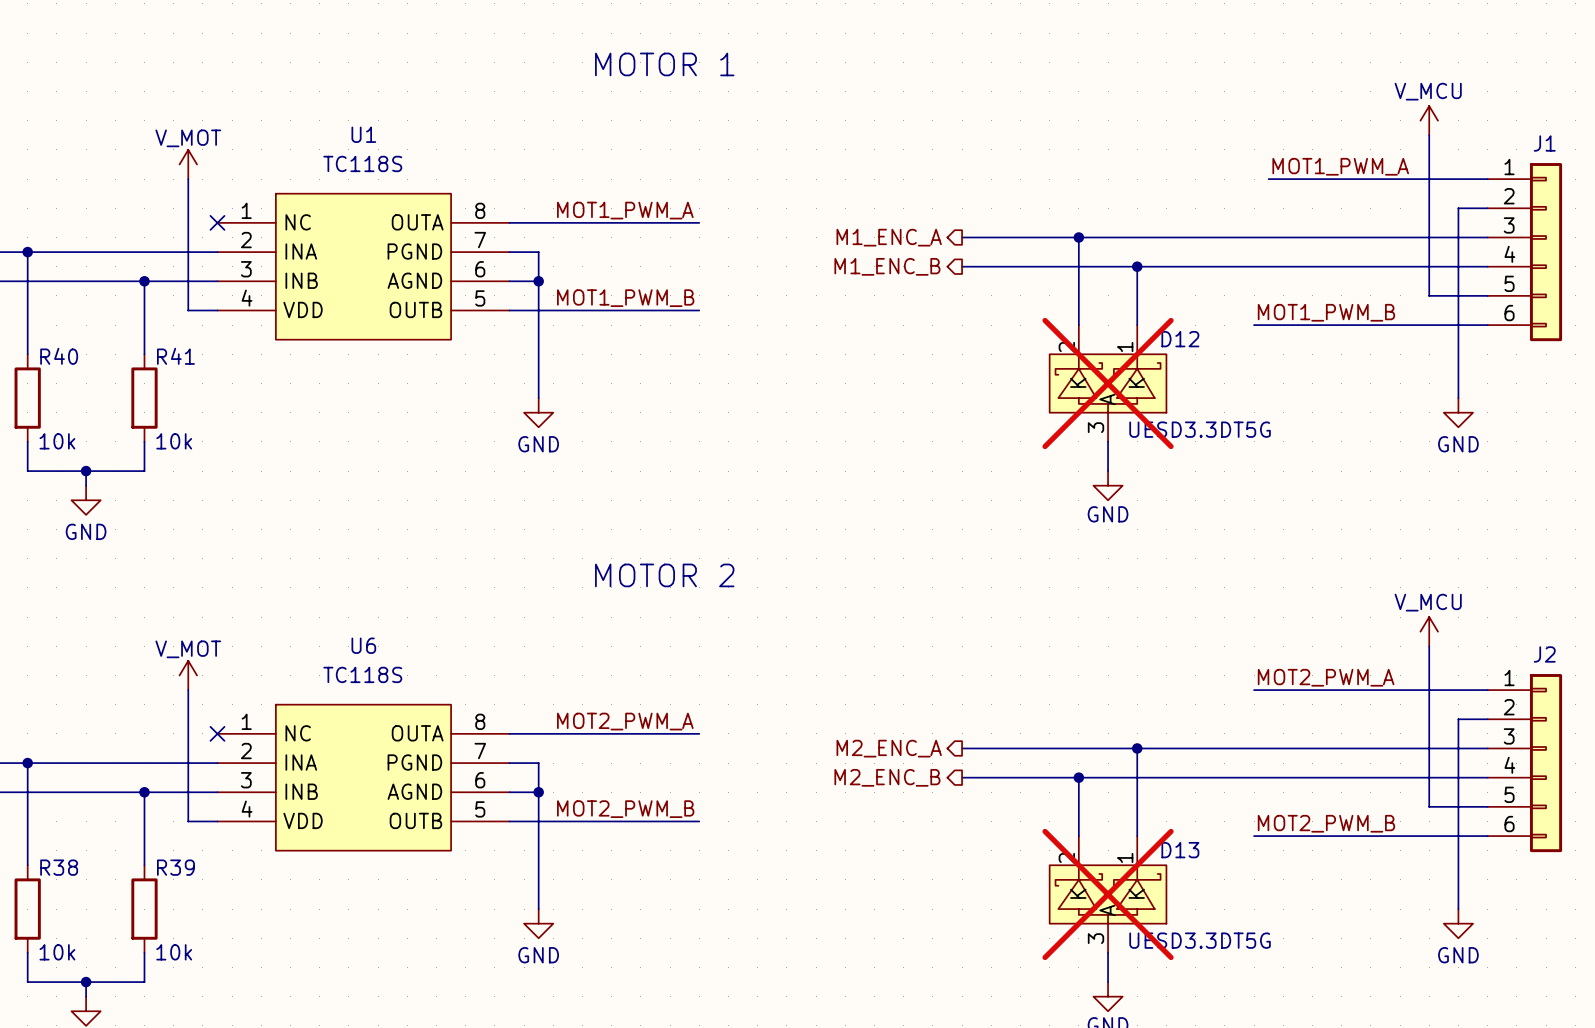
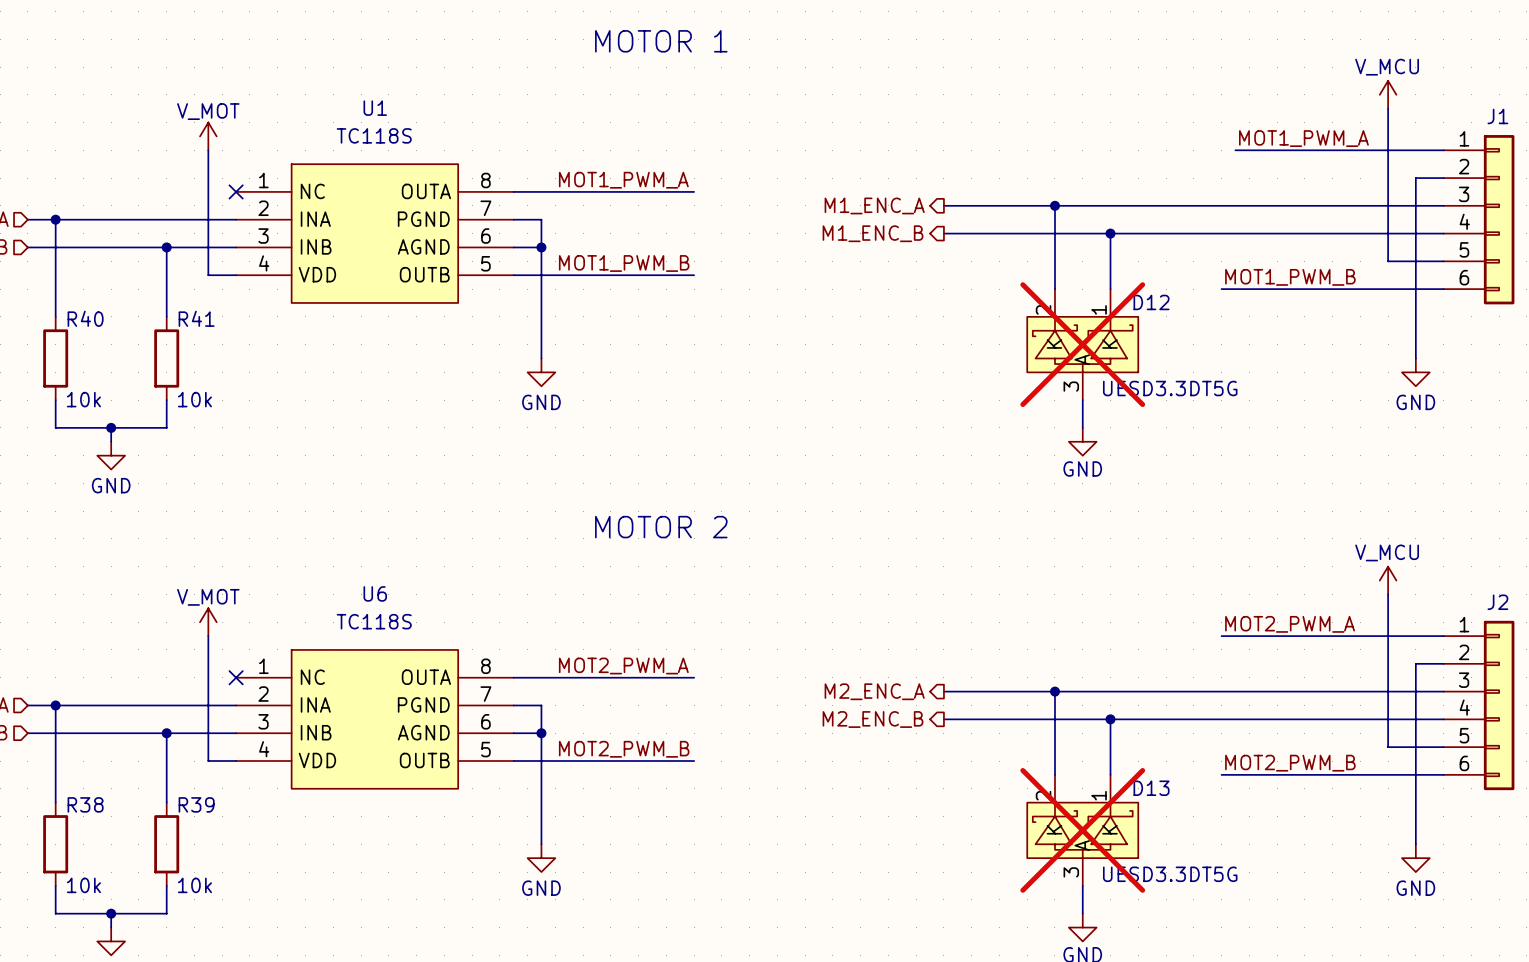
junction: none -> (1054, 691)
wire: (1137, 748) (1137, 777) -> (1054, 691) (1054, 719)
junction: (1137, 748) -> none
junction: (1078, 777) -> none
junction: none -> (1110, 719)

